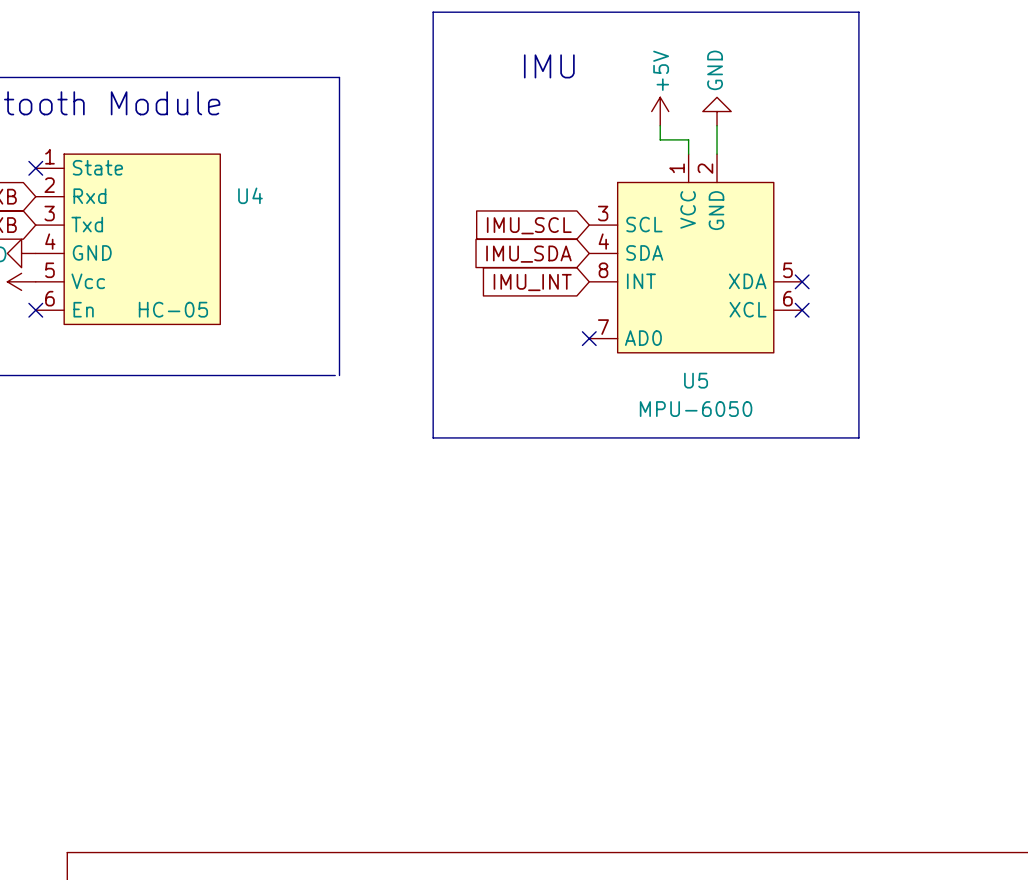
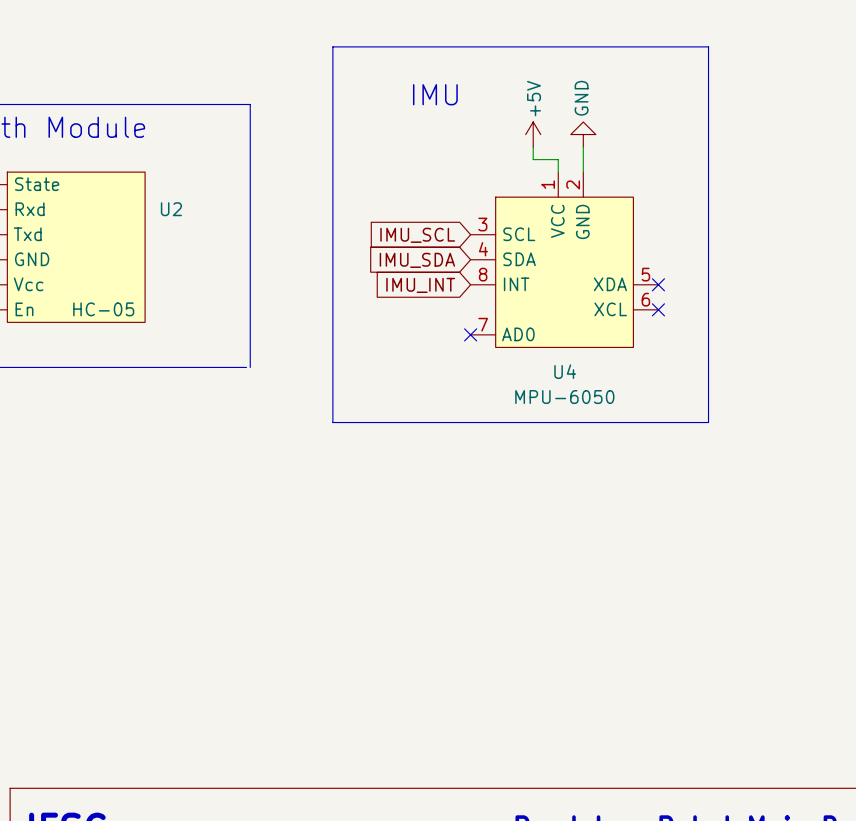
U4 name: U4 (250, 195) -> U2 (171, 209)
U5 name: U5 (696, 380) -> U4 (565, 371)

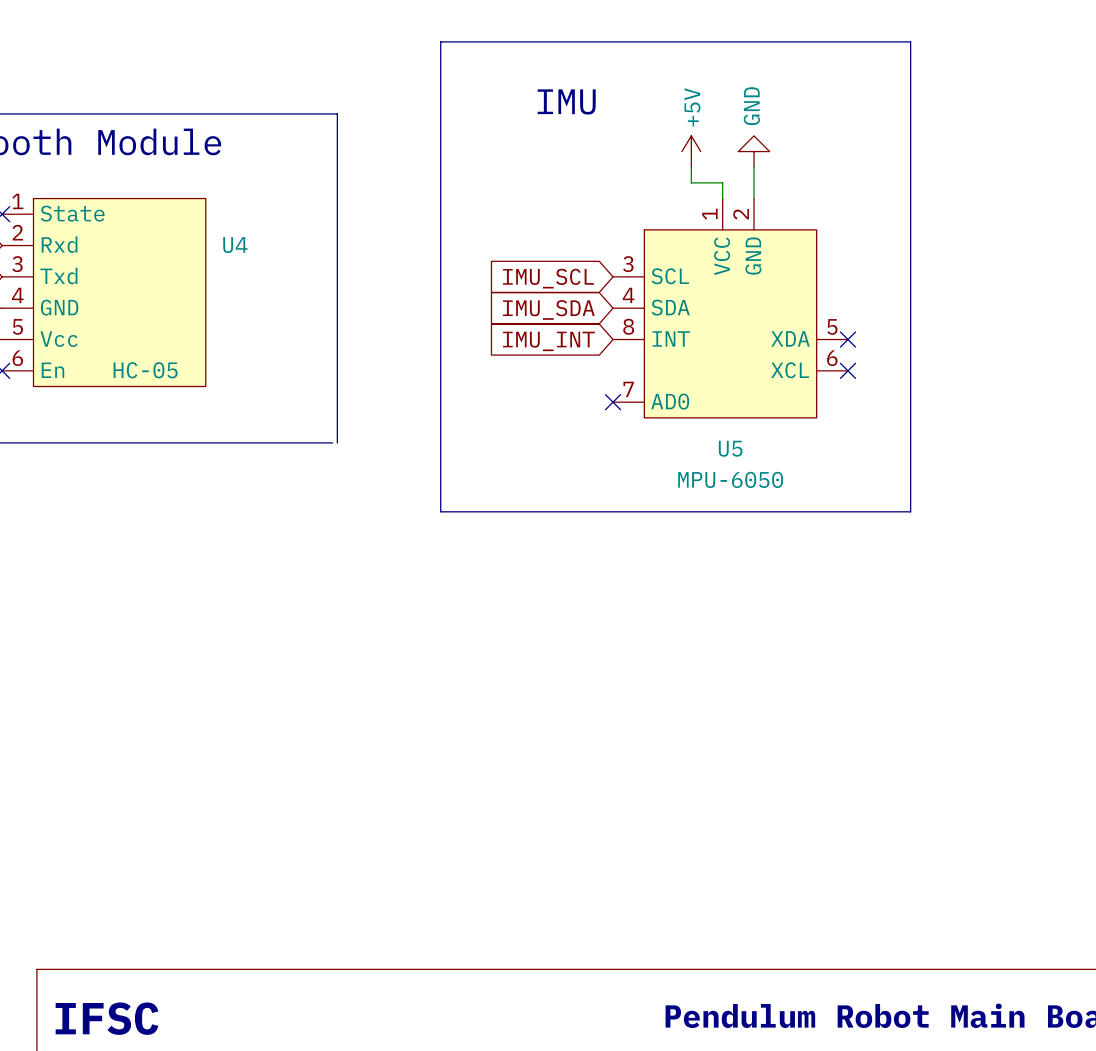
U2 name: U2 (171, 209) -> U4 (235, 245)
U4 name: U4 (565, 371) -> U5 (730, 448)

